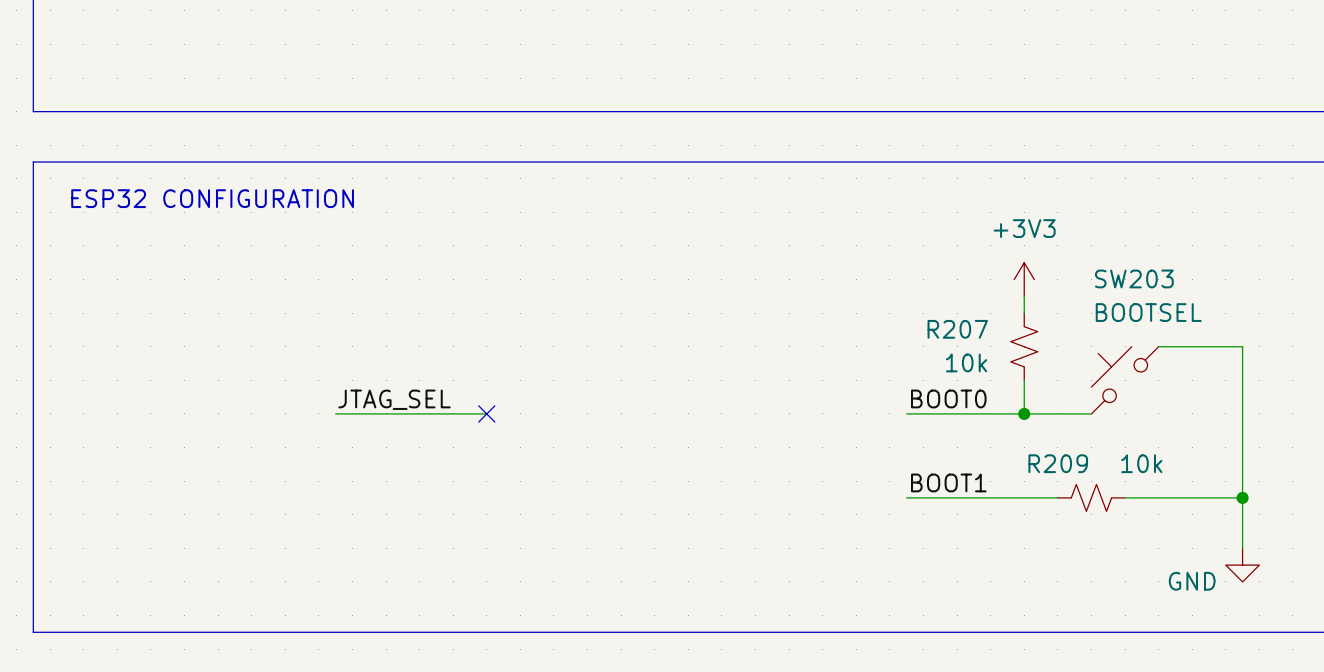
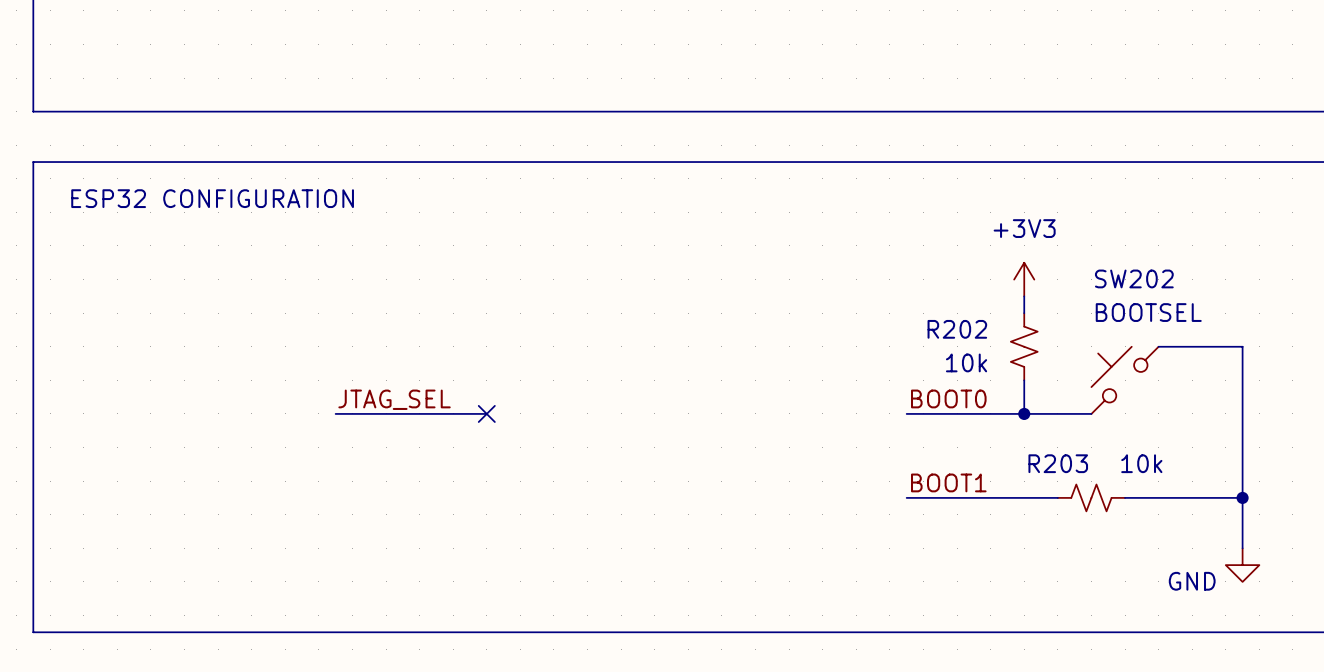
SW203 name: SW203 (1134, 278) -> SW202 (1134, 278)
R207 name: R207 (957, 329) -> R202 (957, 329)
R209 name: R209 (1058, 463) -> R203 (1058, 463)

